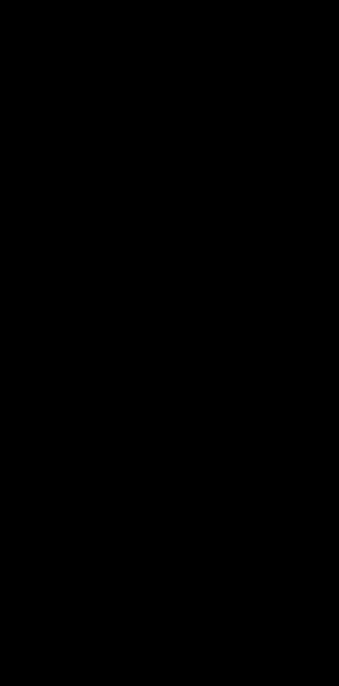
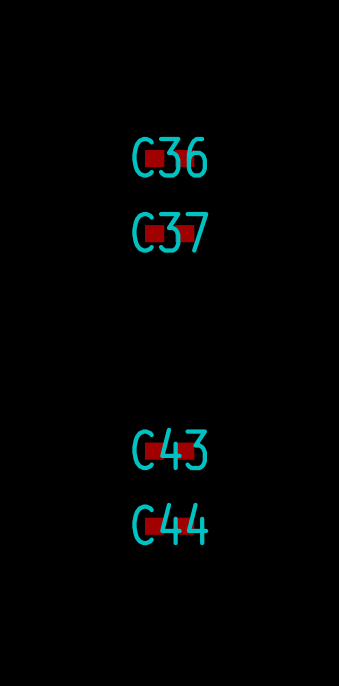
C36: none -> (169, 158)
C37: none -> (169, 233)
C43: none -> (169, 451)
C44: none -> (169, 526)

